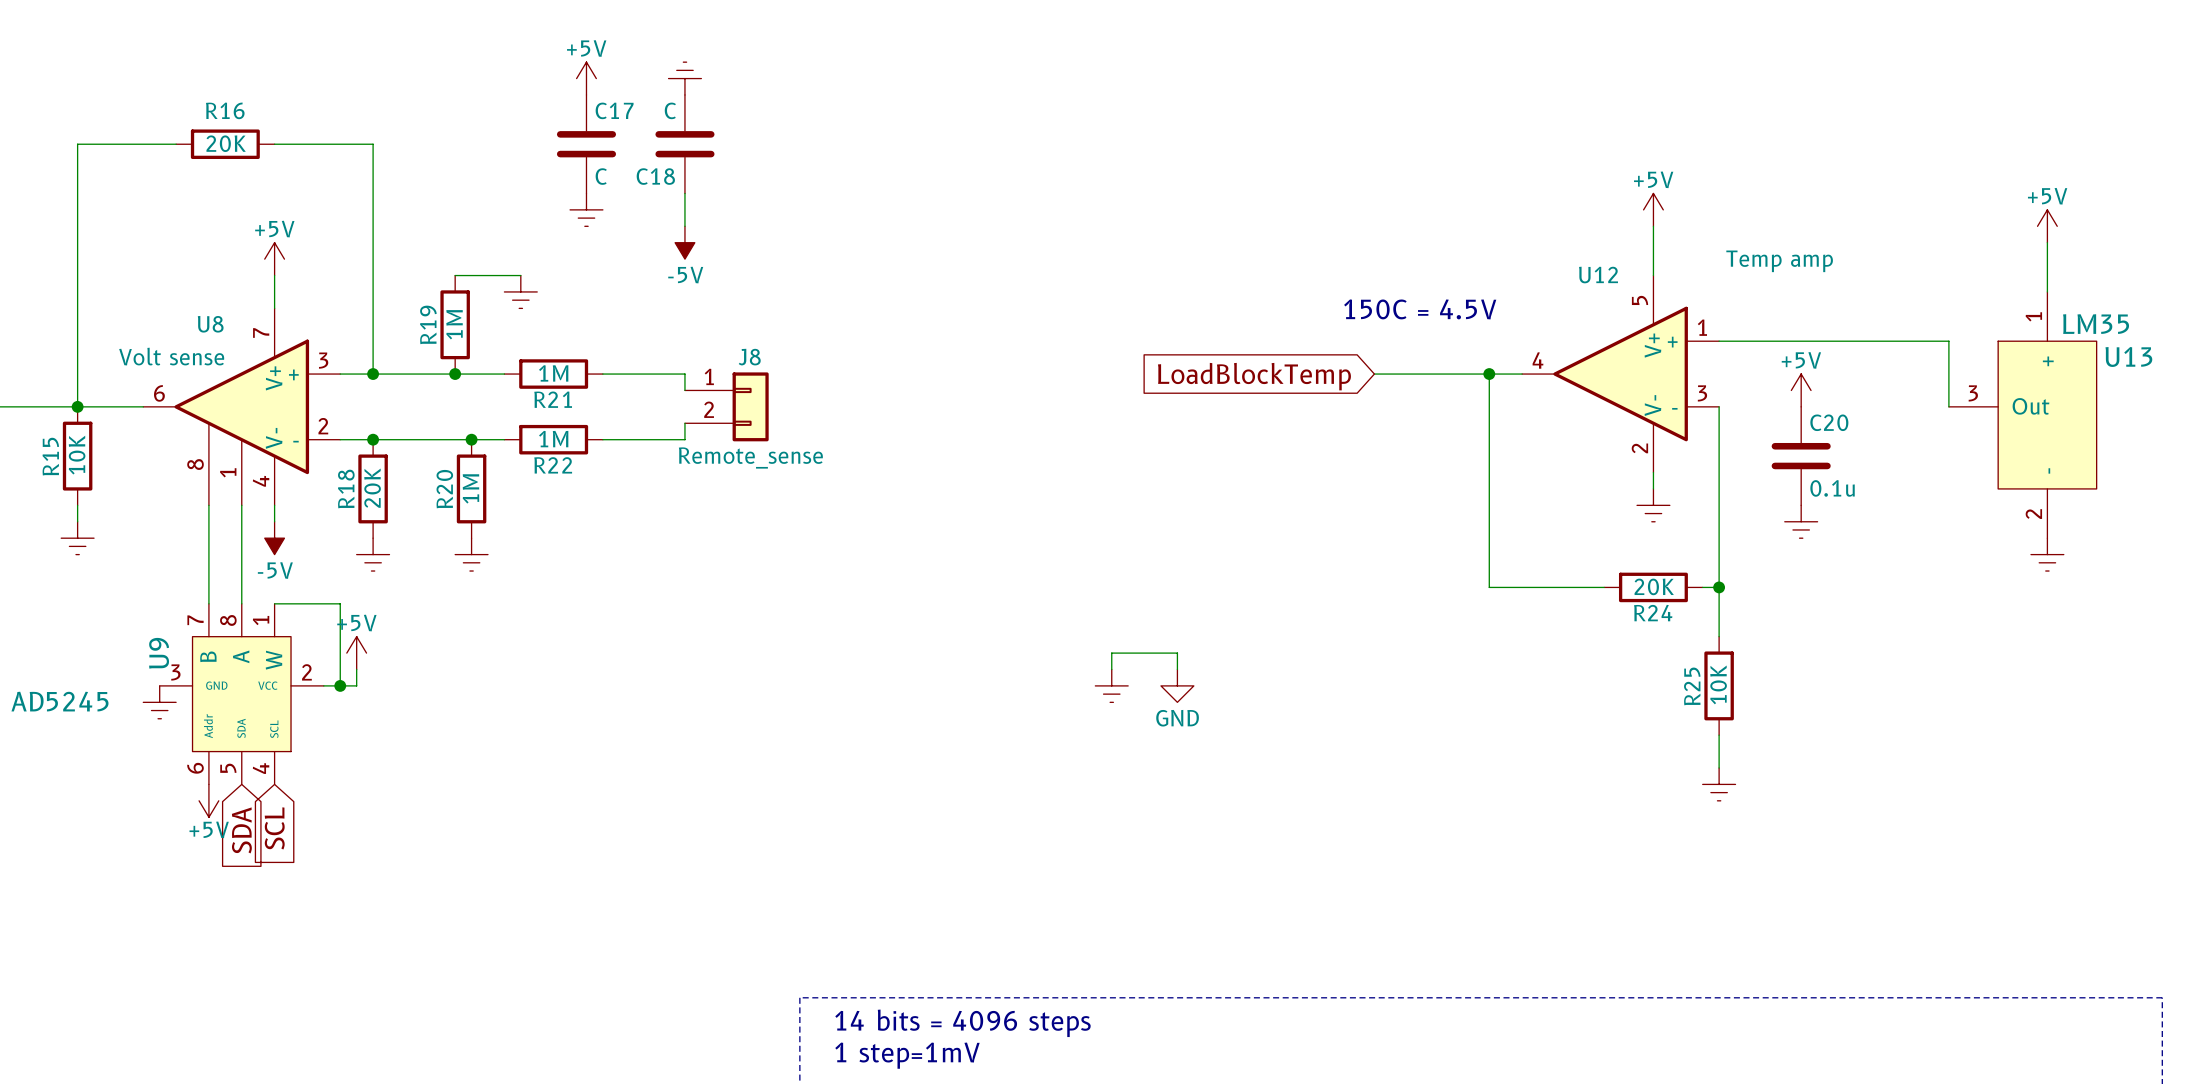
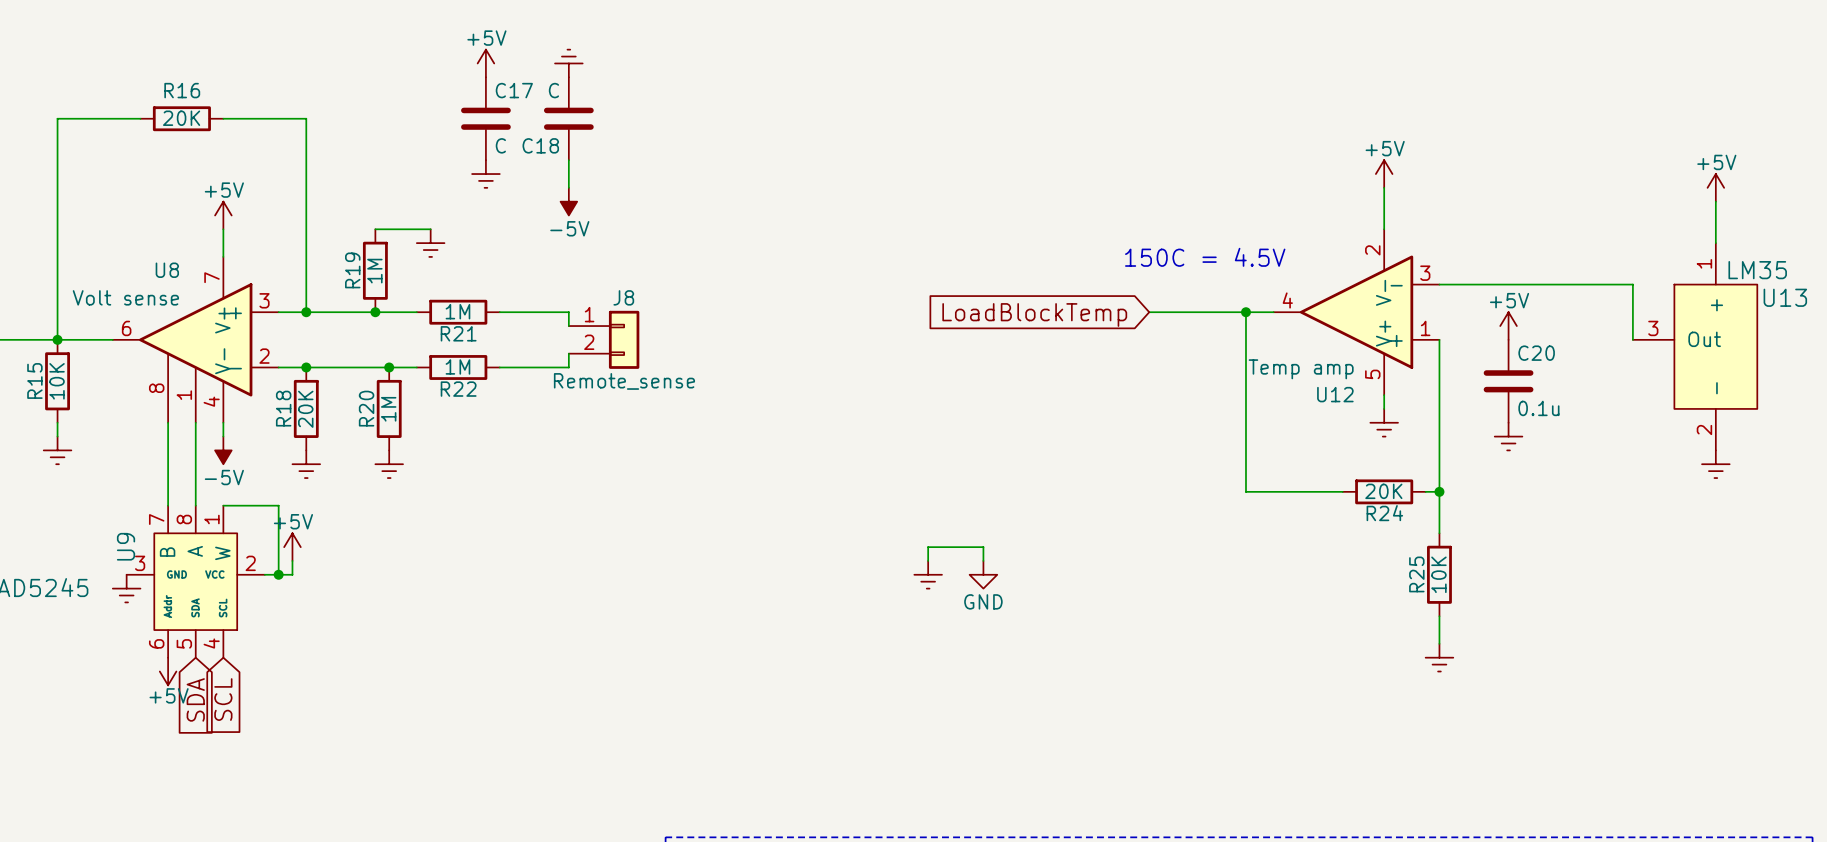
U12 value position: Temp amp (1779, 261) -> Temp amp (1301, 369)
U12 flip: as is (1620, 374) -> up-down (1356, 312)

